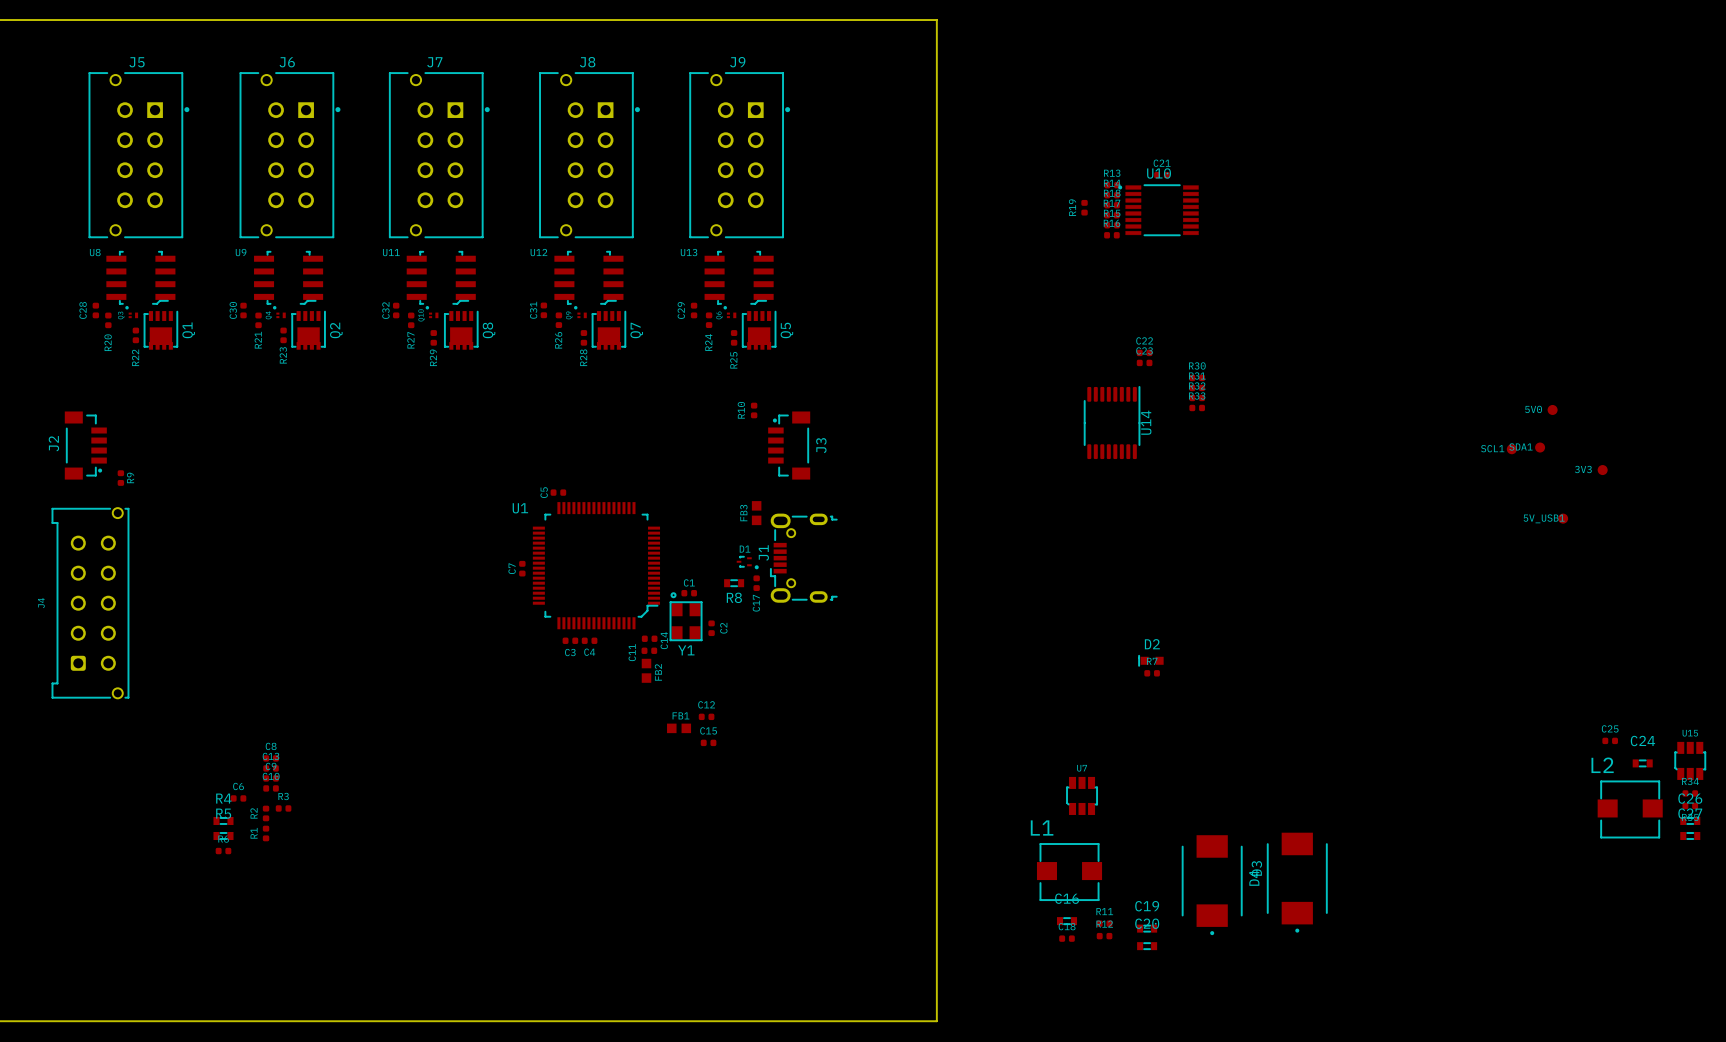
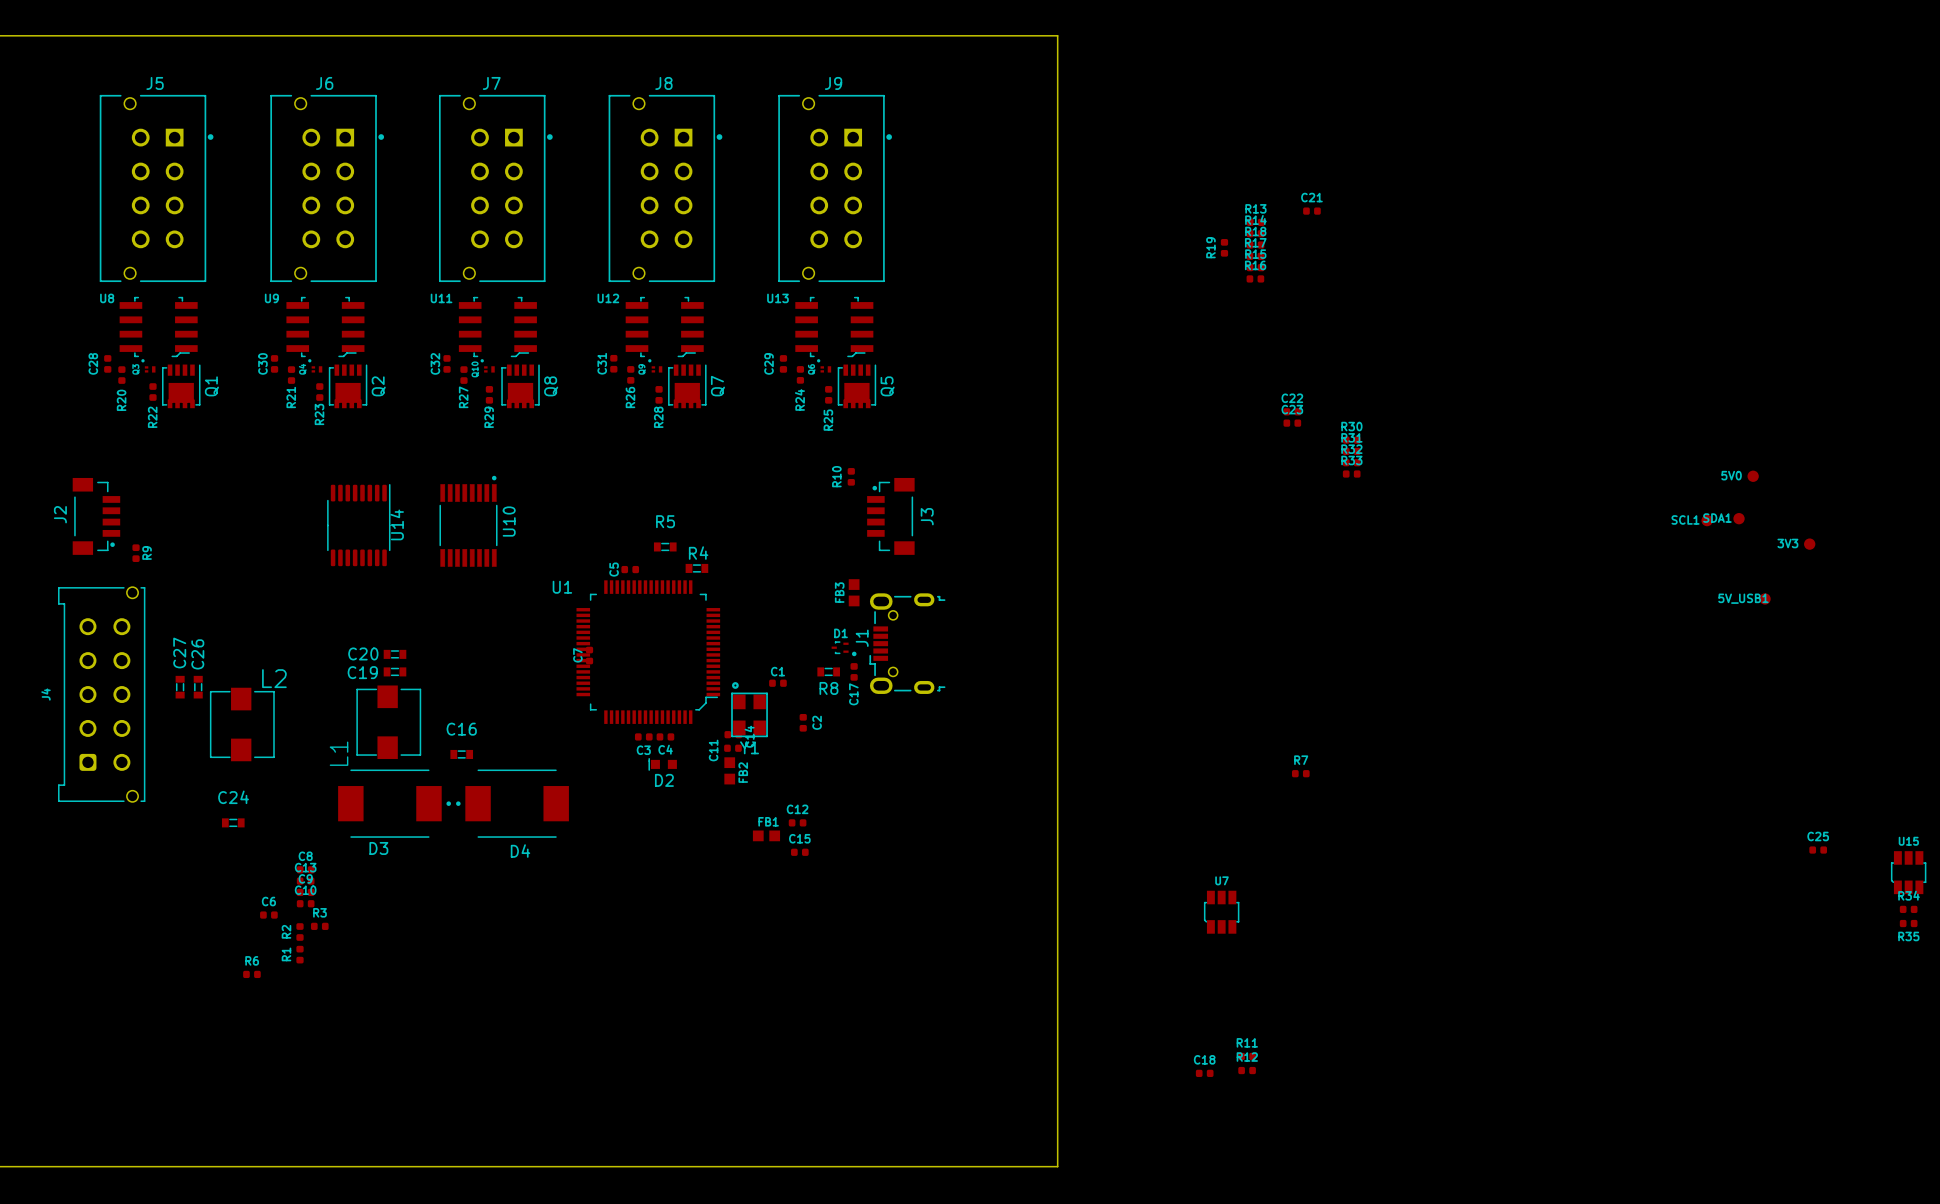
U10 rotation: 0° (1158, 210) -> 90° clockwise (468, 521)
U10 position: (1158, 210) -> (468, 521)
U14 position: (1112, 422) -> (358, 525)
U1 position: (596, 565) -> (648, 652)
Y1 position: (686, 616) -> (749, 709)
D2 name position: D2 (1152, 644) -> D2 (664, 780)
D2 position: (1151, 660) -> (662, 764)
C24 position: (1642, 763) -> (233, 822)
L2 name position: L2 (1602, 765) -> L2 (274, 678)
R4 name position: R4 (223, 798) -> R4 (698, 553)
L2 rotation: 0° (1630, 809) -> 90° counterclockwise (242, 724)
L2 position: (1630, 809) -> (242, 724)
R4 position: (223, 820) -> (696, 568)
C26 rotation: 0° (1690, 820) -> 90° clockwise (198, 687)
C26 position: (1690, 820) -> (198, 687)
R5 position: (223, 836) -> (665, 546)
C27 rotation: 0° (1690, 836) -> 90° clockwise (180, 687)
C27 position: (1690, 836) -> (180, 687)
L1 rotation: 0° (1069, 872) -> 90° counterclockwise (388, 722)
L1 position: (1069, 872) -> (388, 722)
D3 rotation: 0° (1297, 882) -> 90° counterclockwise (394, 803)
D3 position: (1297, 882) -> (394, 803)
D4 rotation: 0° (1212, 885) -> 90° clockwise (512, 803)
D4 position: (1212, 885) -> (512, 803)
C19 name position: C19 (1147, 906) -> C19 (362, 672)
C16 position: (1067, 921) -> (461, 754)
C20 name position: C20 (1147, 923) -> C20 (363, 653)
C19 position: (1147, 928) -> (394, 671)
C20 position: (1147, 946) -> (394, 654)

